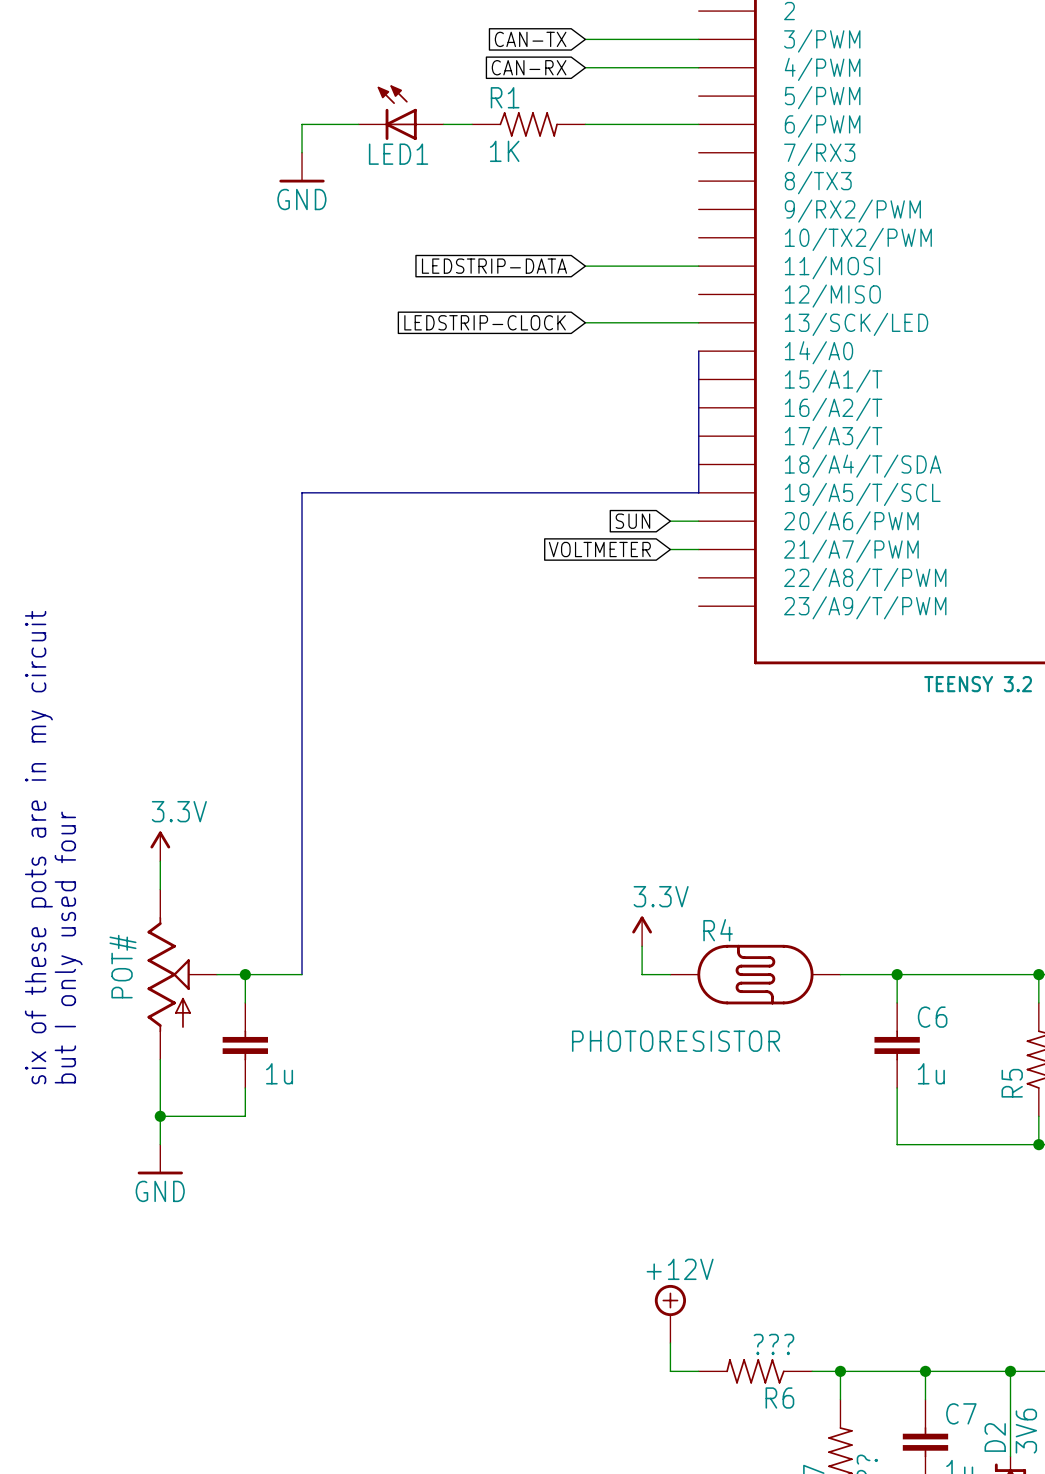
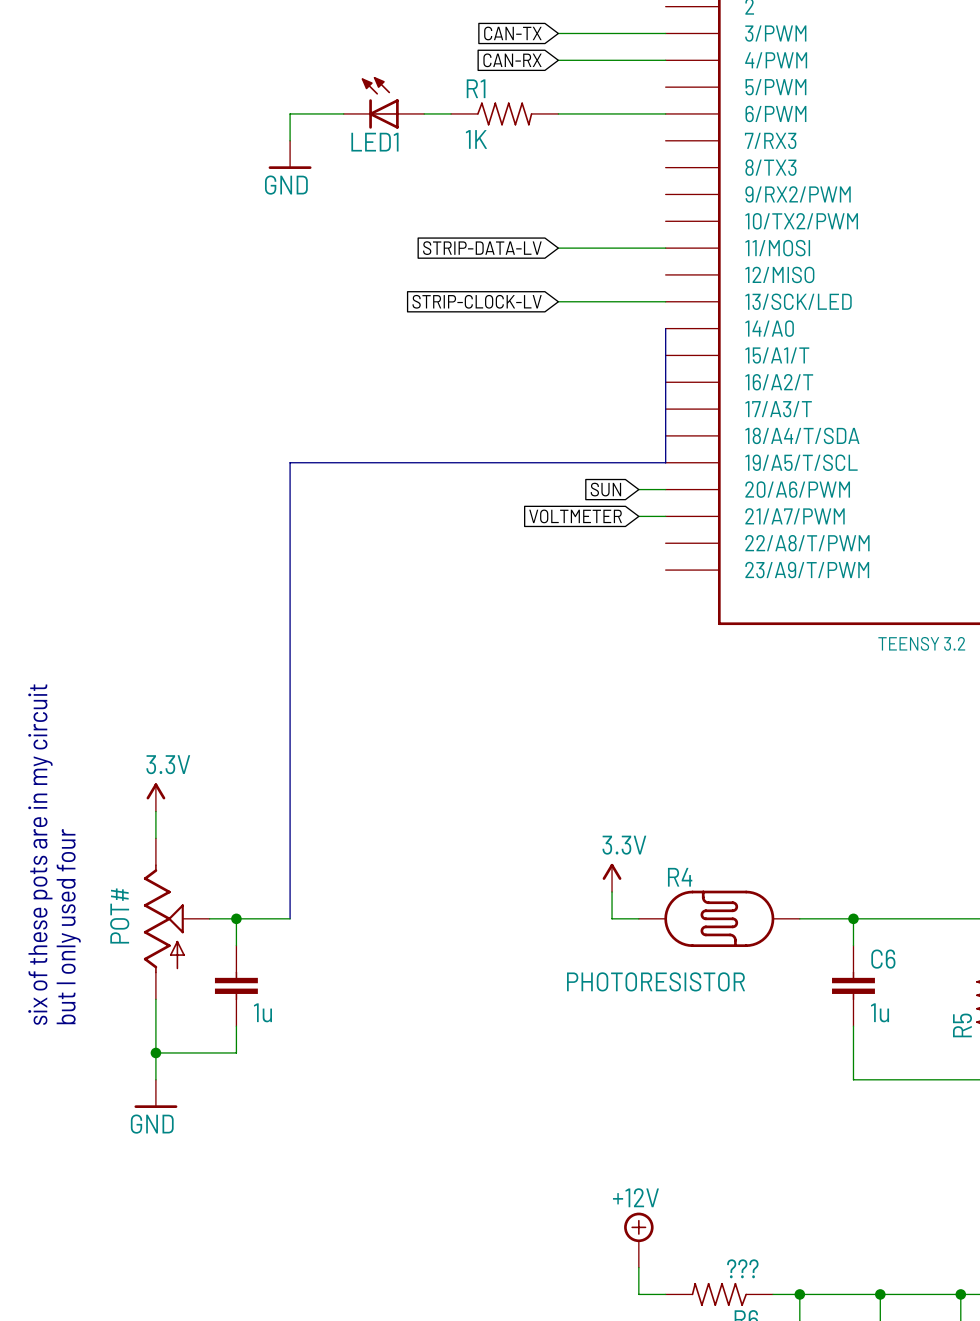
global label: LEDSTRIP-DATA (494, 266) -> STRIP-DATA-LV (482, 248)
global label: LEDSTRIP-CLOCK (485, 322) -> STRIP-CLOCK-LV (477, 301)

